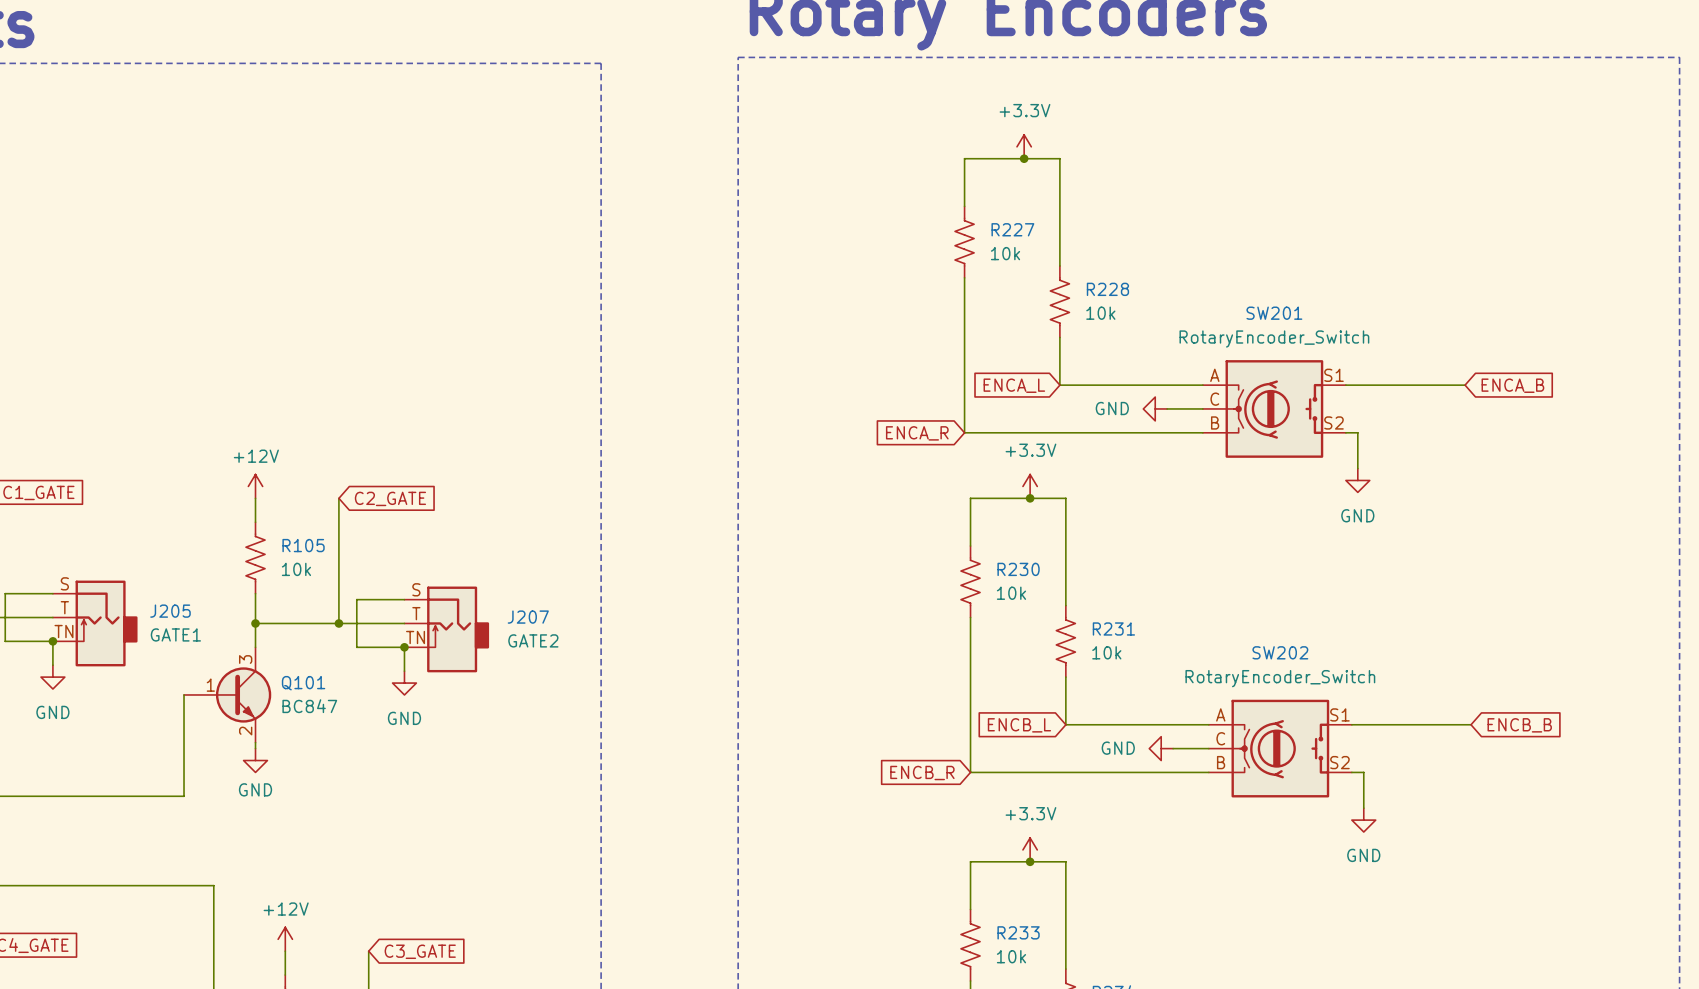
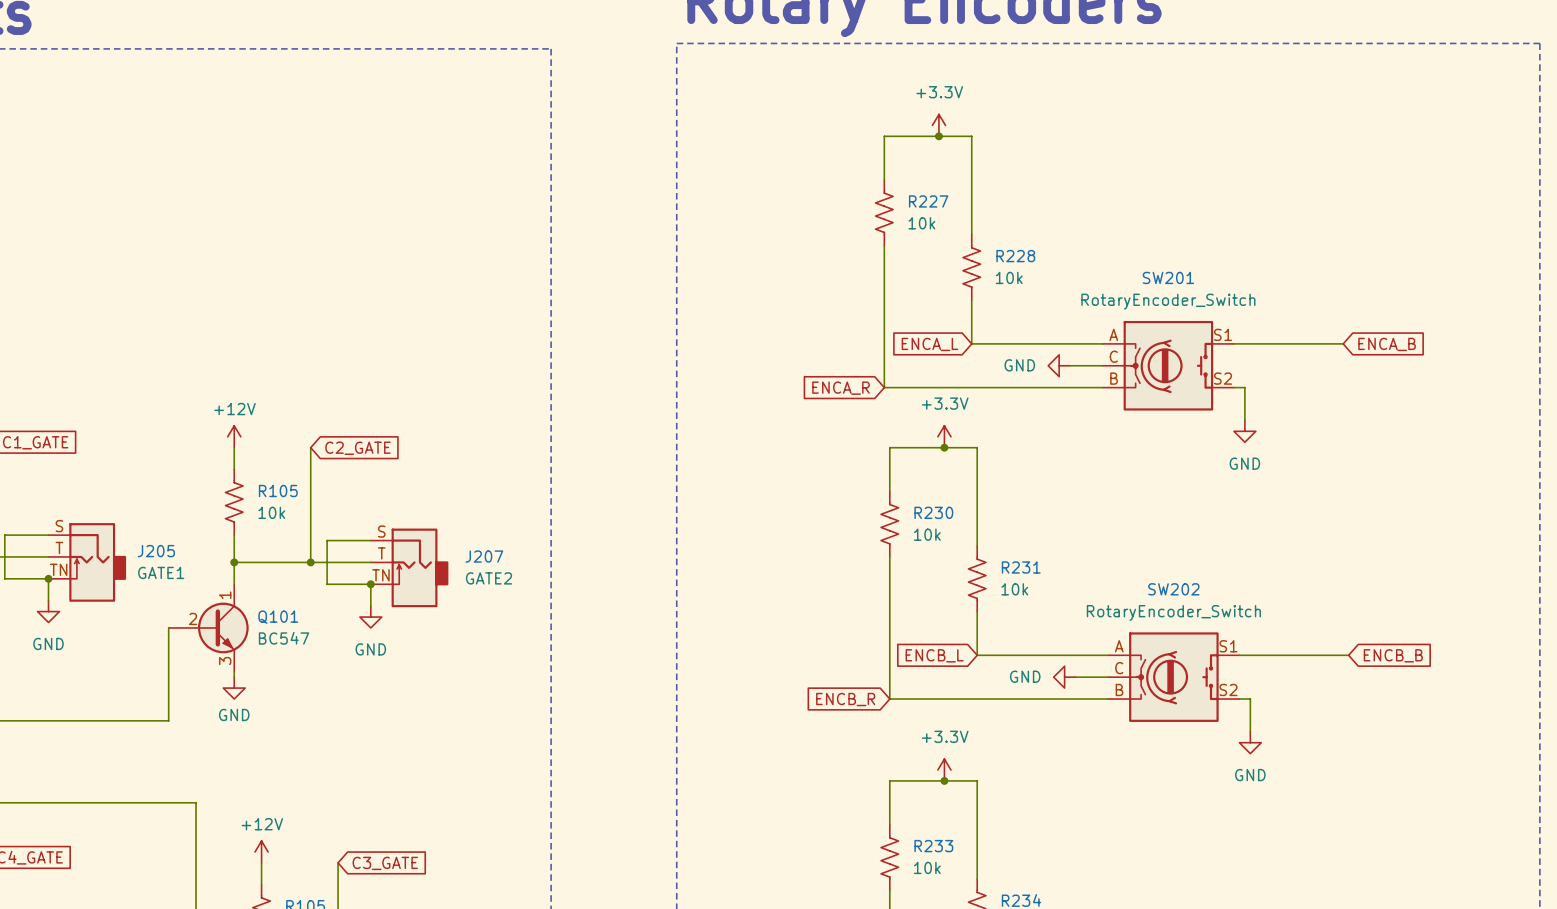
Q101 pin number: 3 (245, 659) -> 1 (225, 595)
Q101 pin number: 1 (210, 685) -> 2 (193, 618)
Q101 value: BC847 (309, 706) -> BC547 (284, 638)
Q101 pin number: 2 (245, 731) -> 3 (225, 661)

